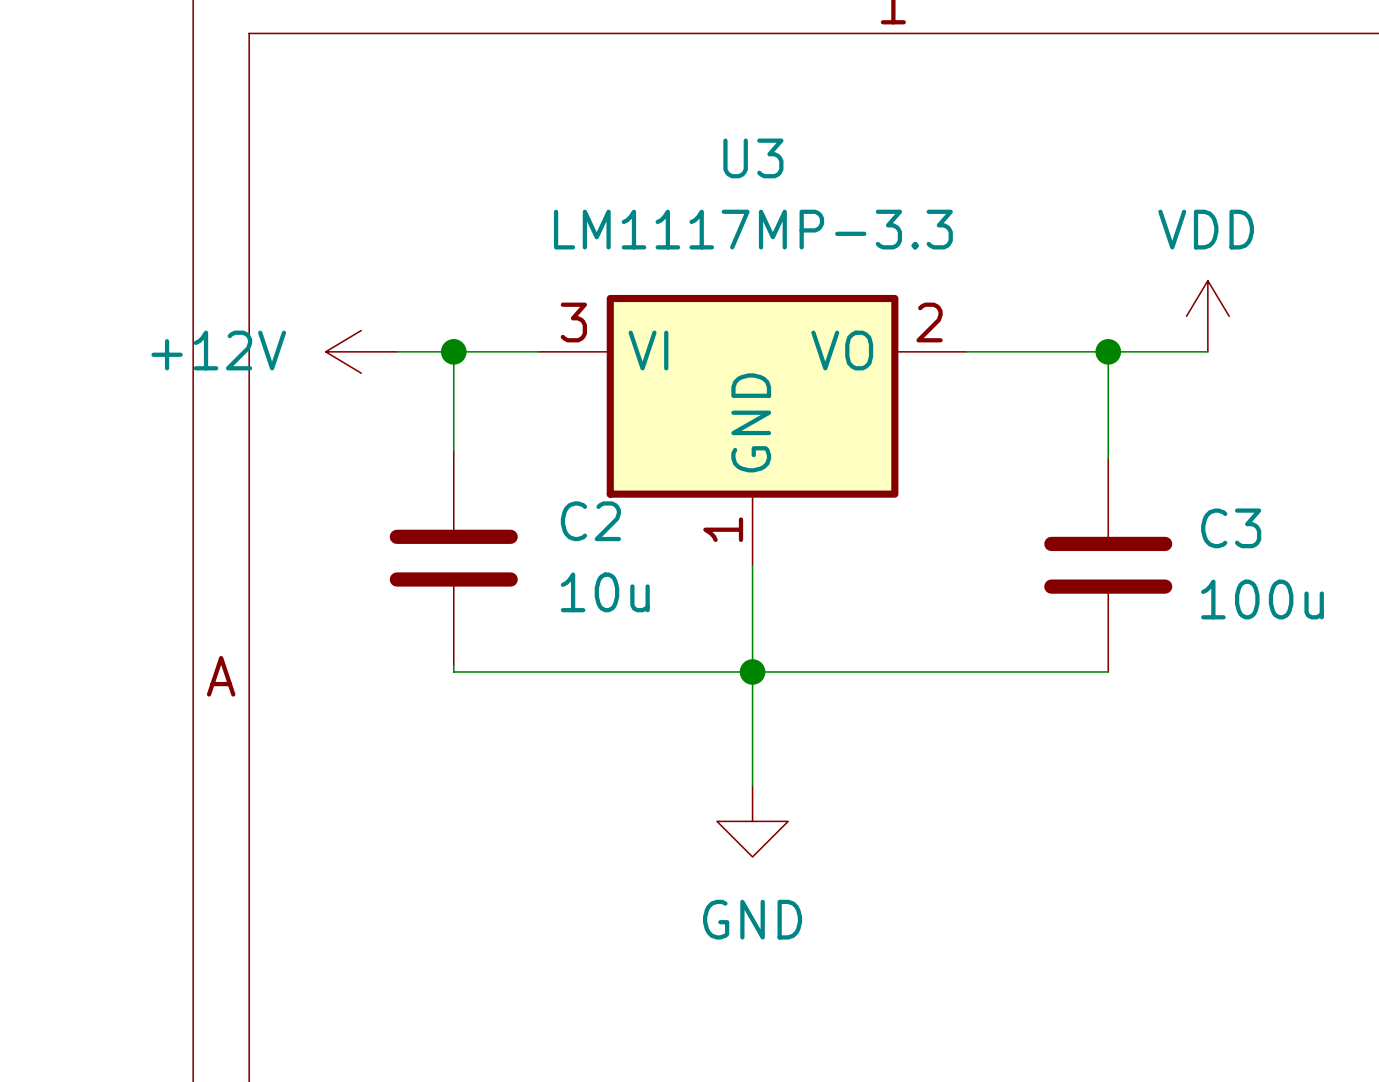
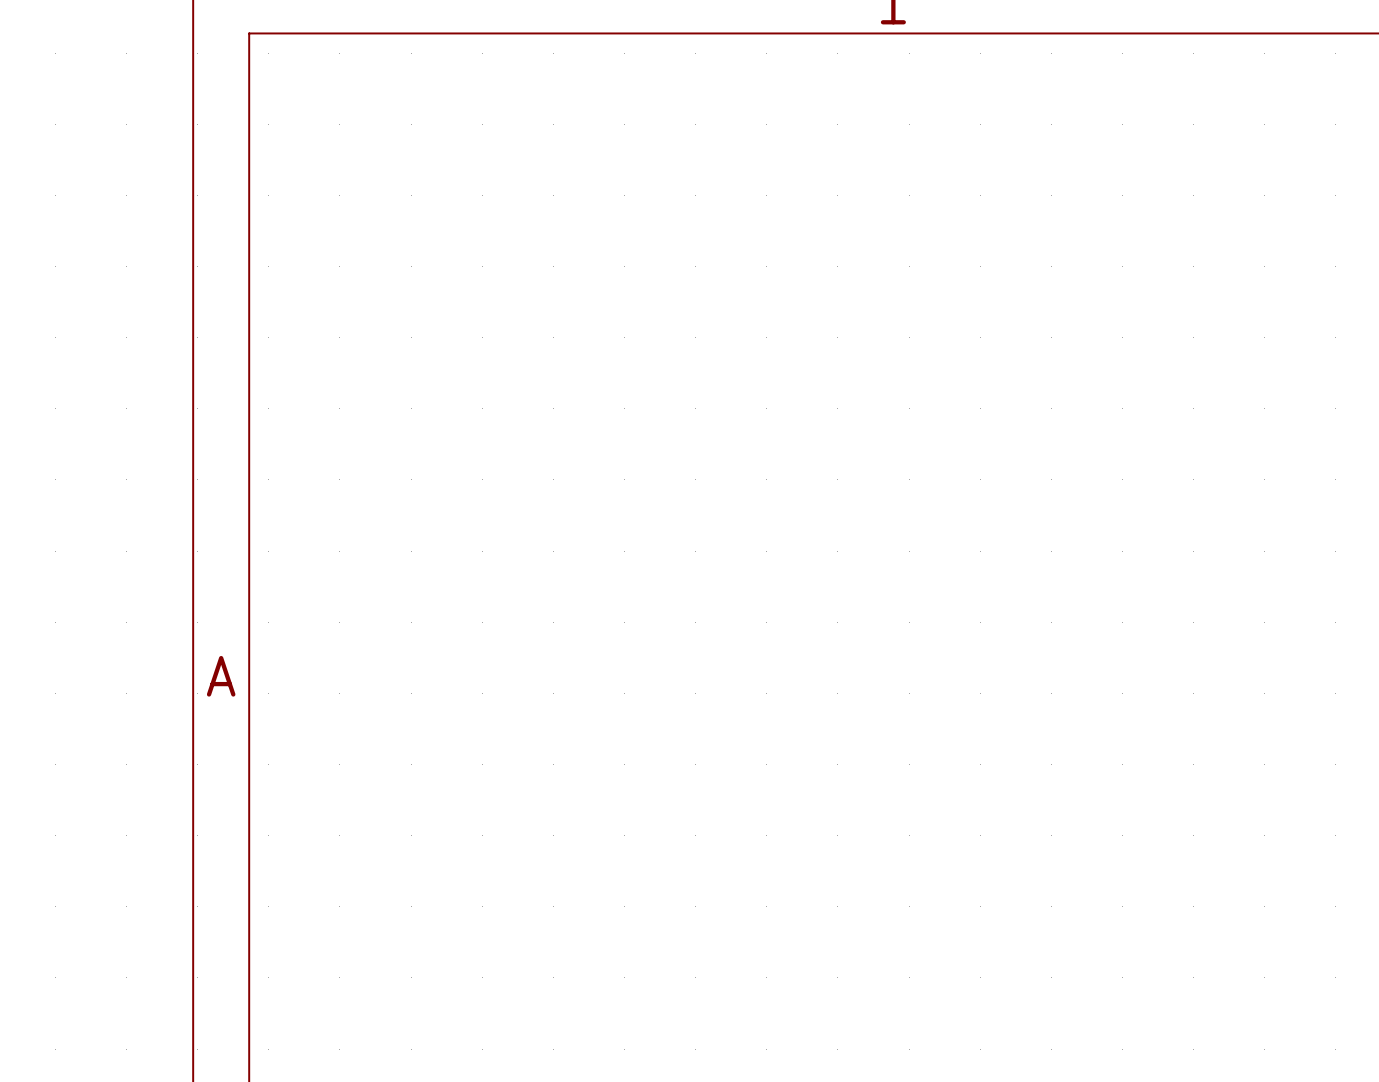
power symbol: VDD (1207, 316) -> none
power symbol: +12V (361, 351) -> none
wire: (396, 351) (539, 351) -> none
wire: (453, 351) (453, 451) -> none
junction: (453, 351) -> none
wire: (965, 351) (1207, 351) -> none
wire: (1108, 351) (1108, 458) -> none
junction: (1108, 351) -> none
U3: LM1117MP-3.3 (752, 430) -> none
C2: 10u (453, 558) -> none
wire: (752, 565) (752, 785) -> none
C3: 100u (1108, 565) -> none
wire: (453, 664) (453, 671) (1108, 671) -> none
junction: (752, 671) -> none
power symbol: GND (752, 821) -> none

